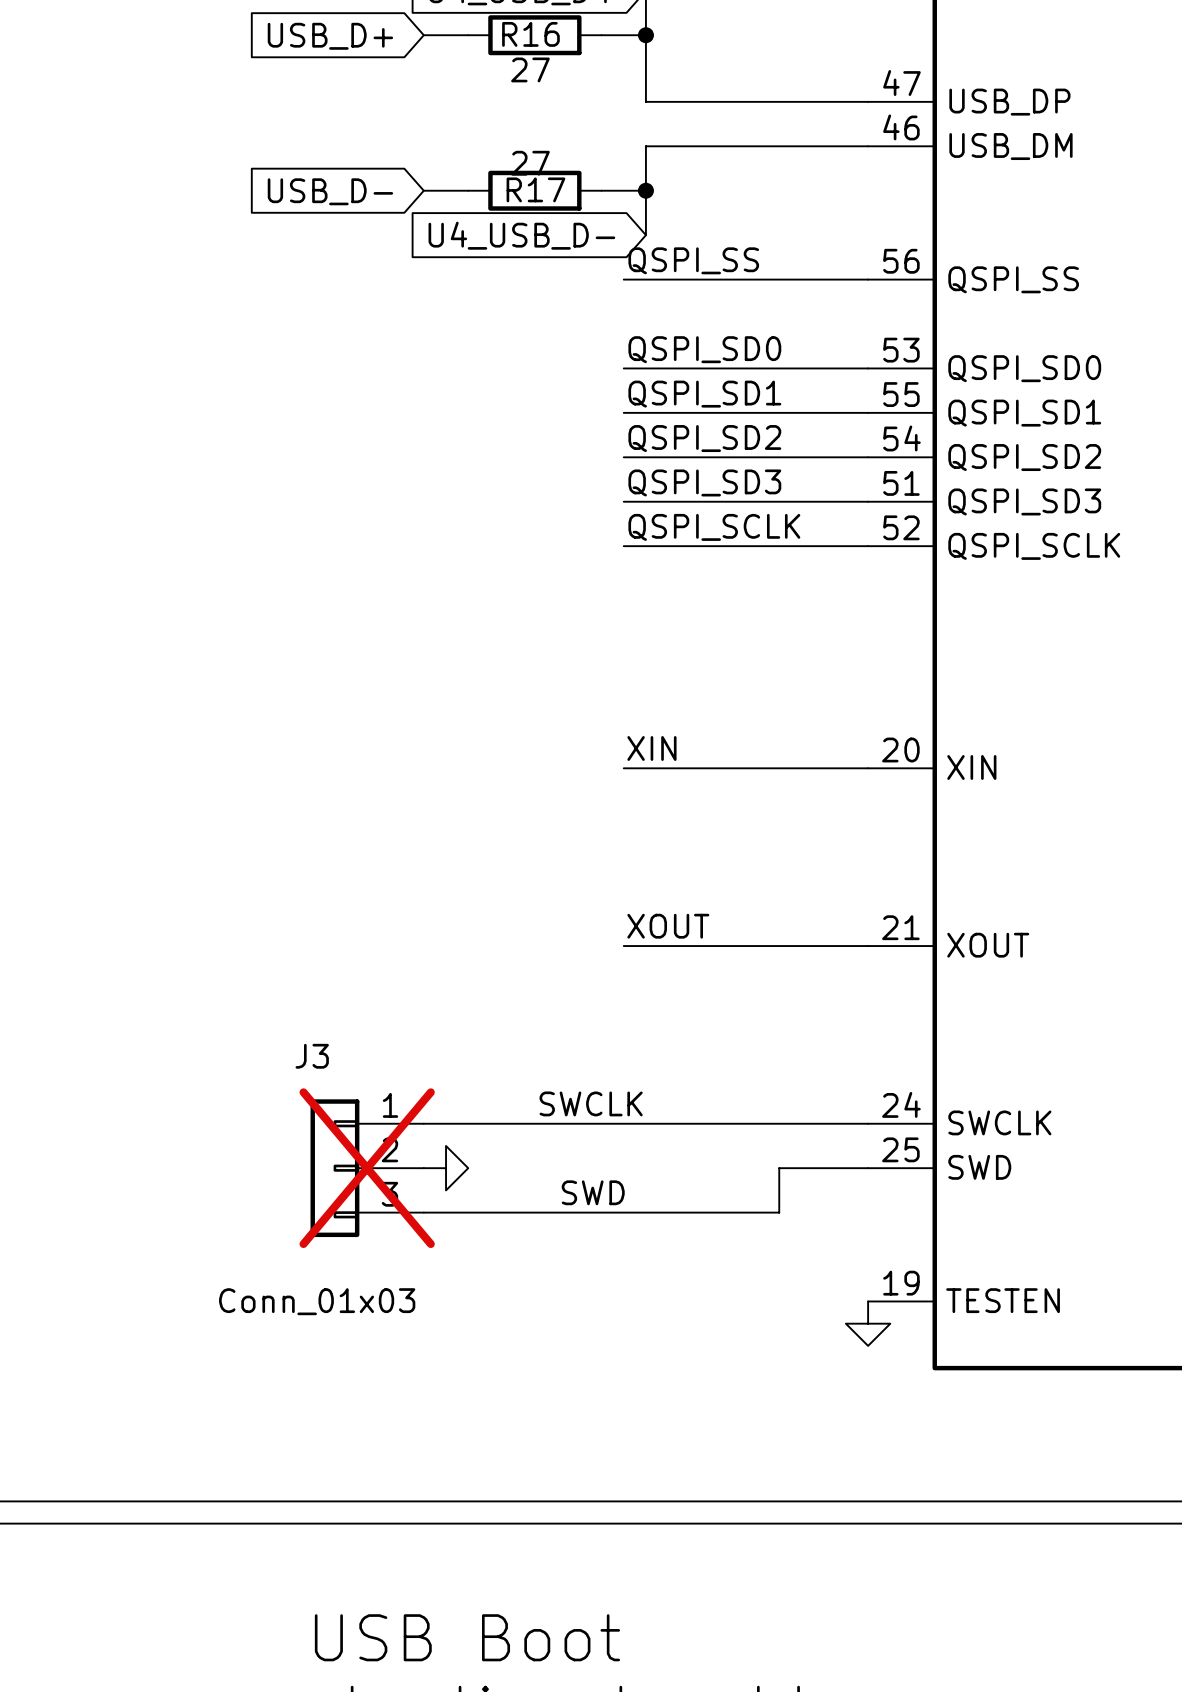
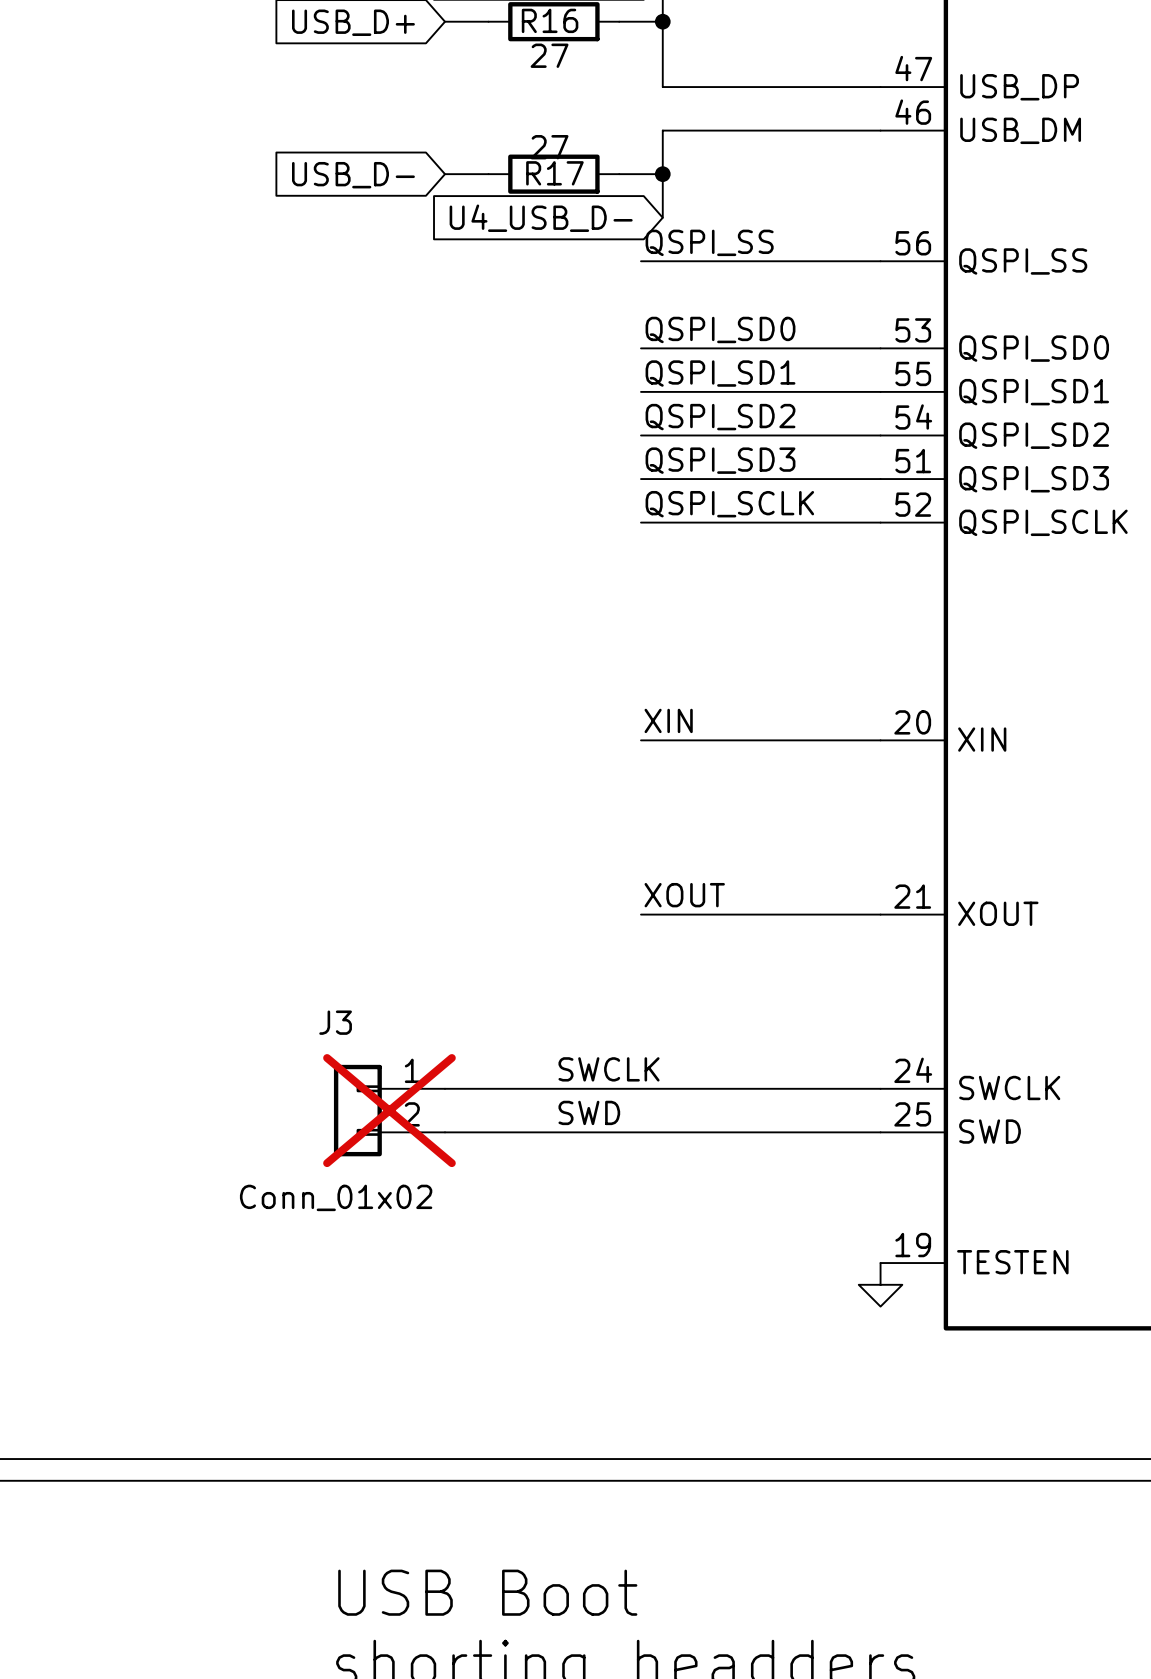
J3 symbol: [310, 1099, 424, 1238] -> [333, 1064, 446, 1157]
power symbol: (446, 1168) -> none
wire: (779, 1168) (779, 1212) (423, 1212) -> (793, 1132) (445, 1132)
label position: SWD (593, 1192) -> SWD (589, 1112)
J3 value: Conn_01x03 (317, 1301) -> Conn_01x02 (336, 1197)

